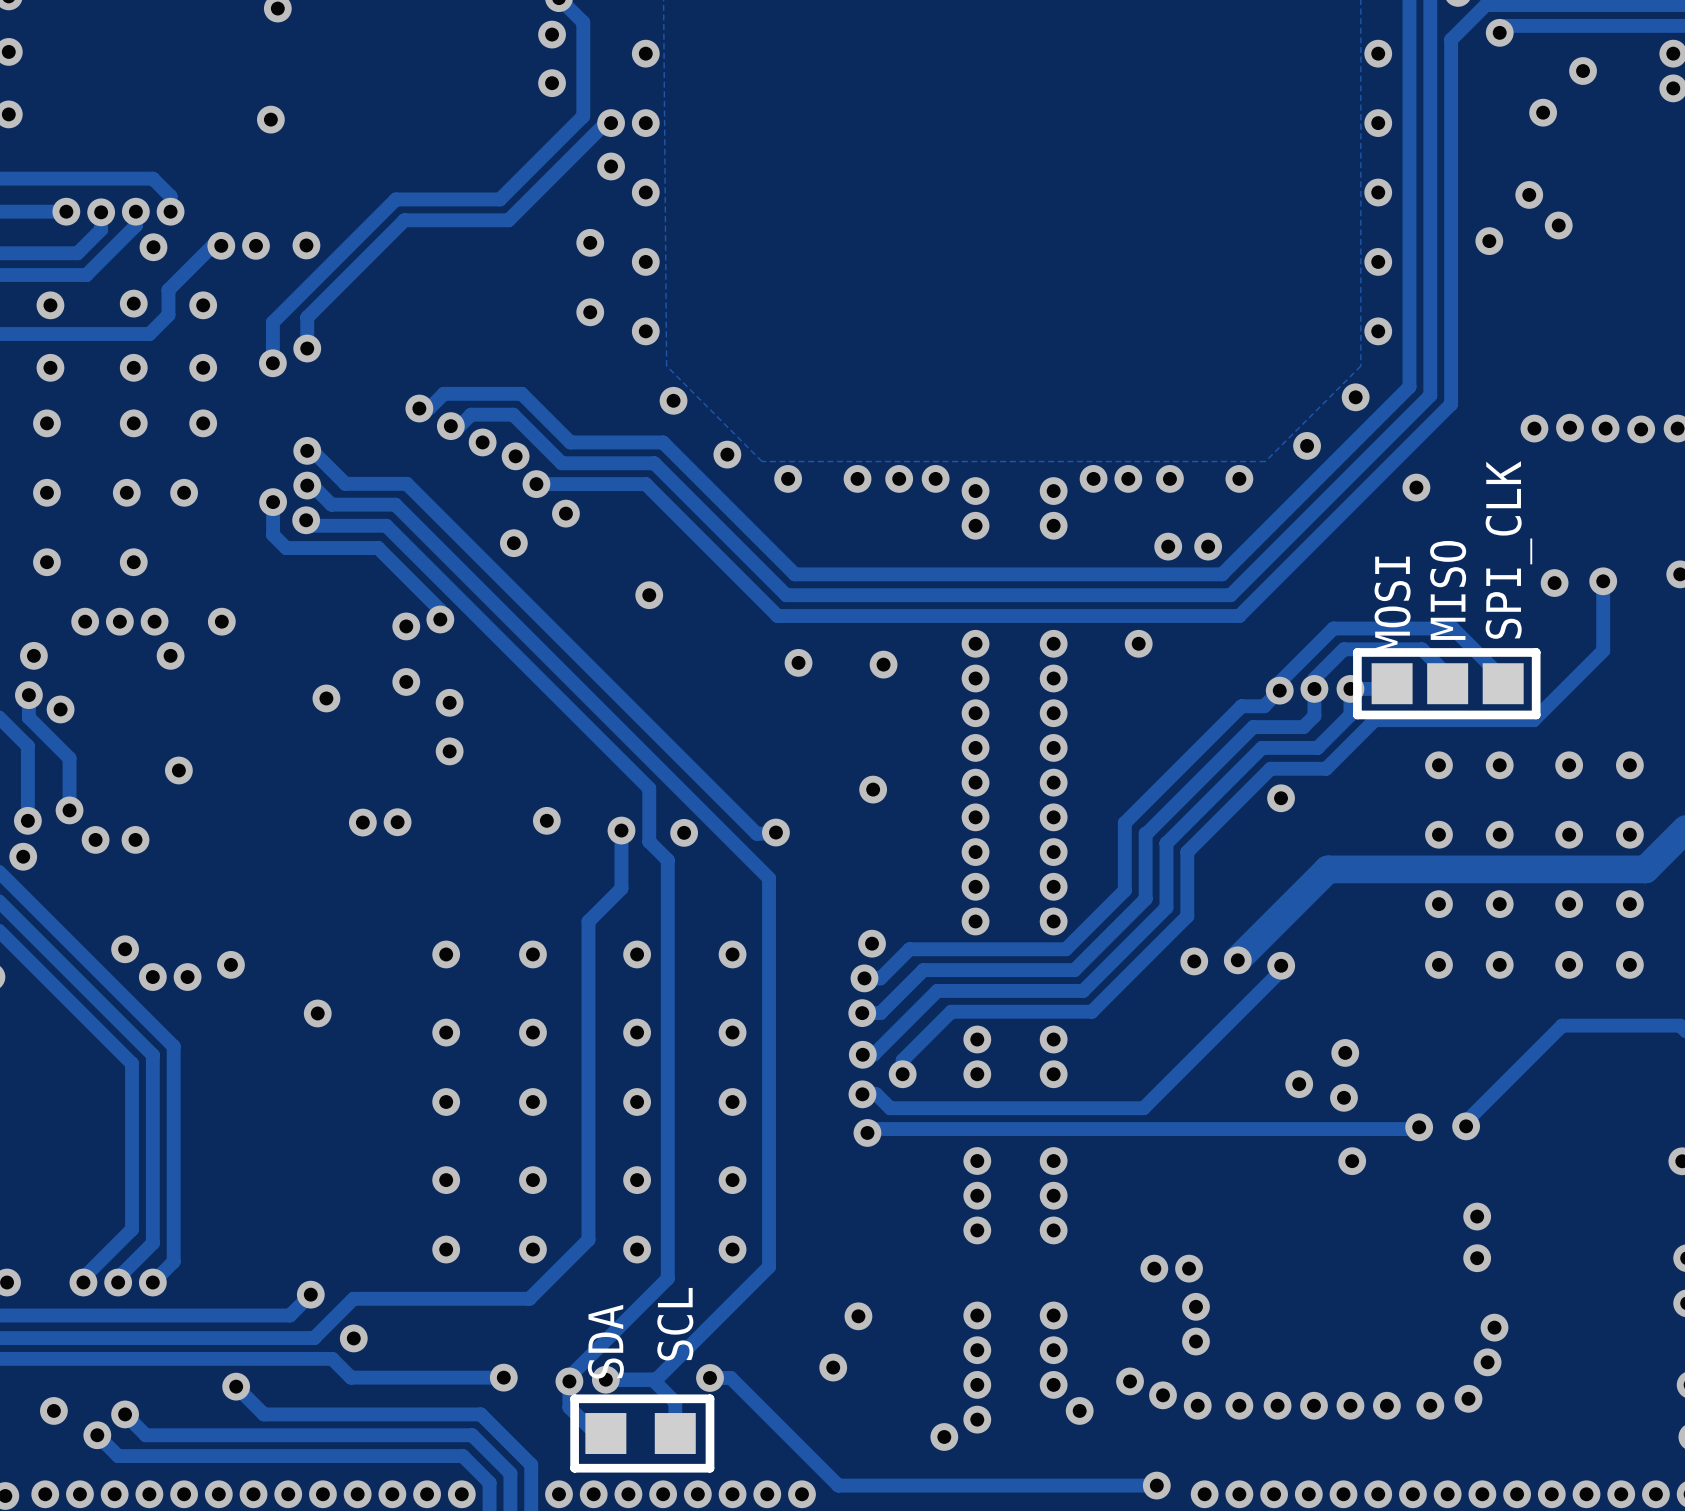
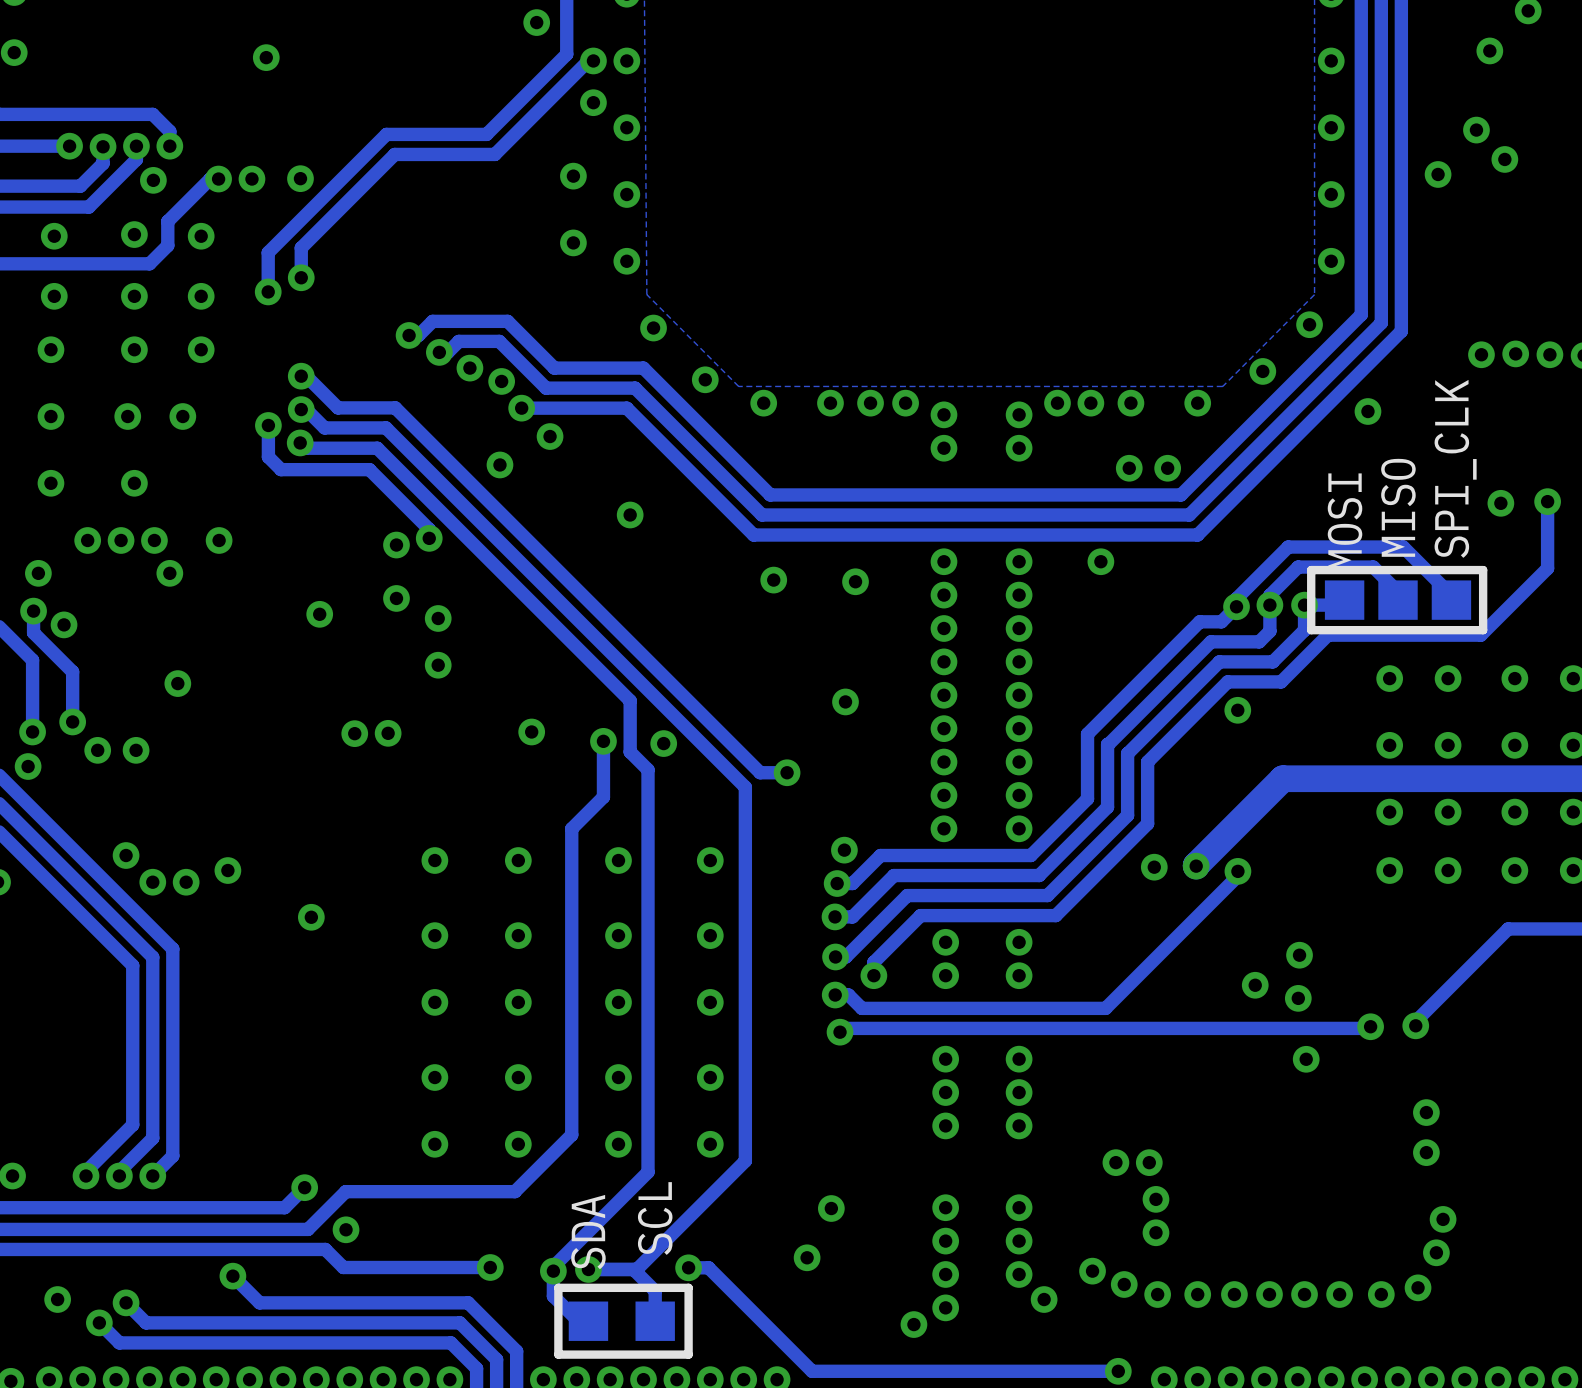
track: (405, 483) (756, 833) (775, 832) -> (395, 407) (760, 772) (787, 772)
via position: (775, 832) -> (787, 772)

